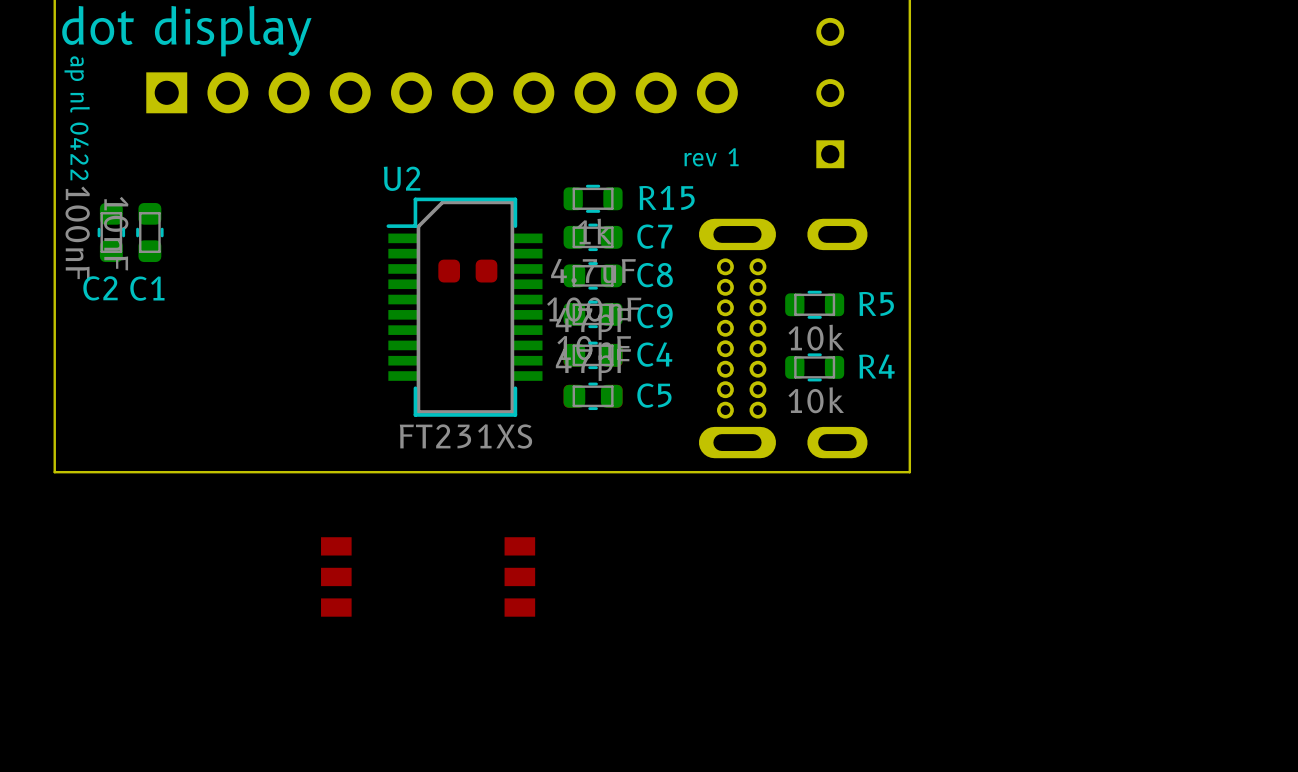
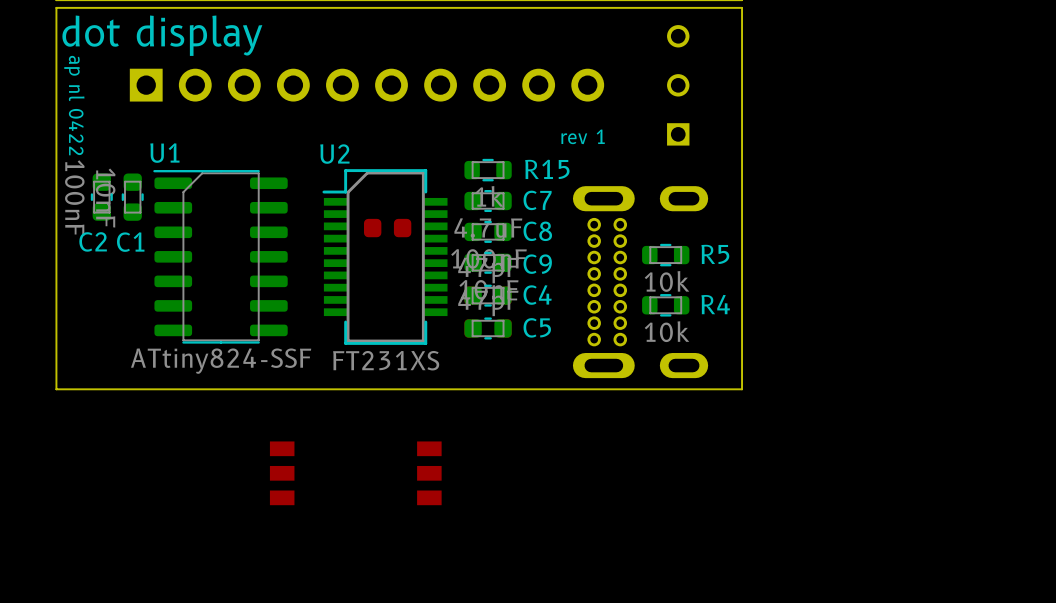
U1: none -> ATtiny824-SSF (220, 256)

